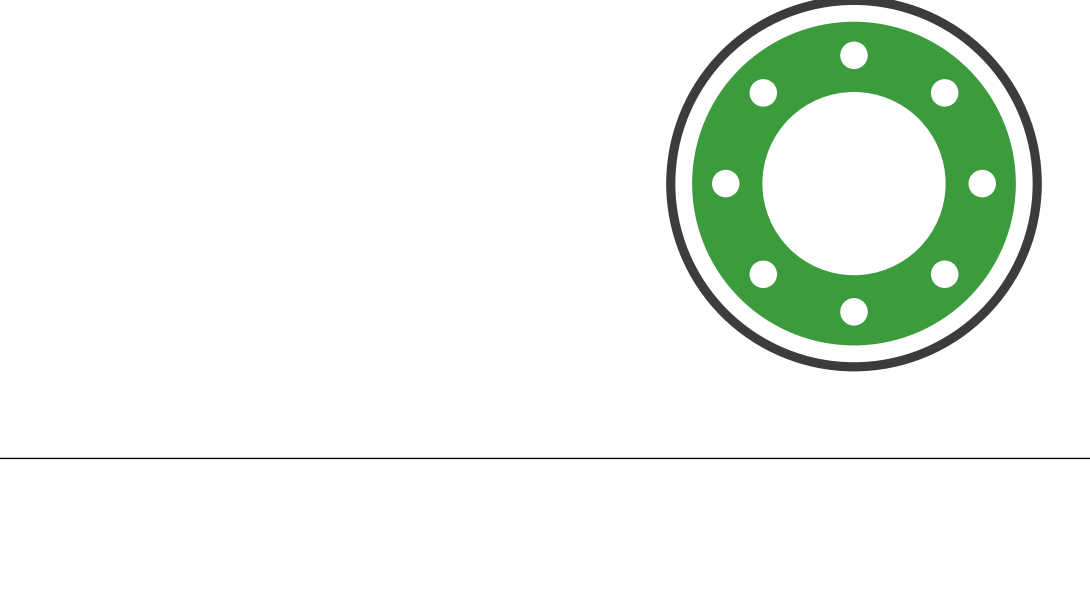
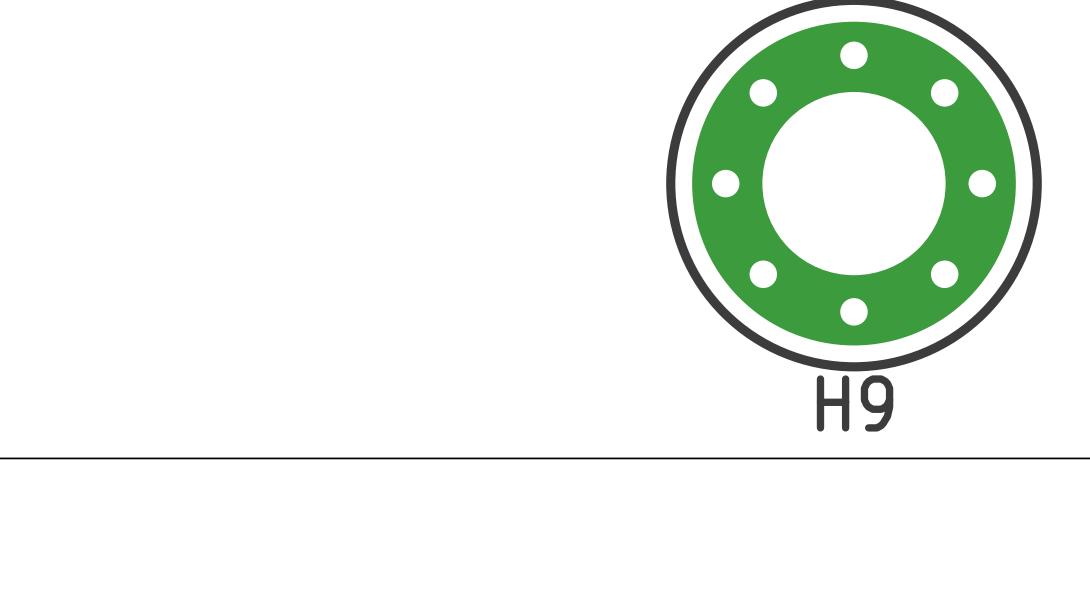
H9 name: none -> H9 (855, 403)

